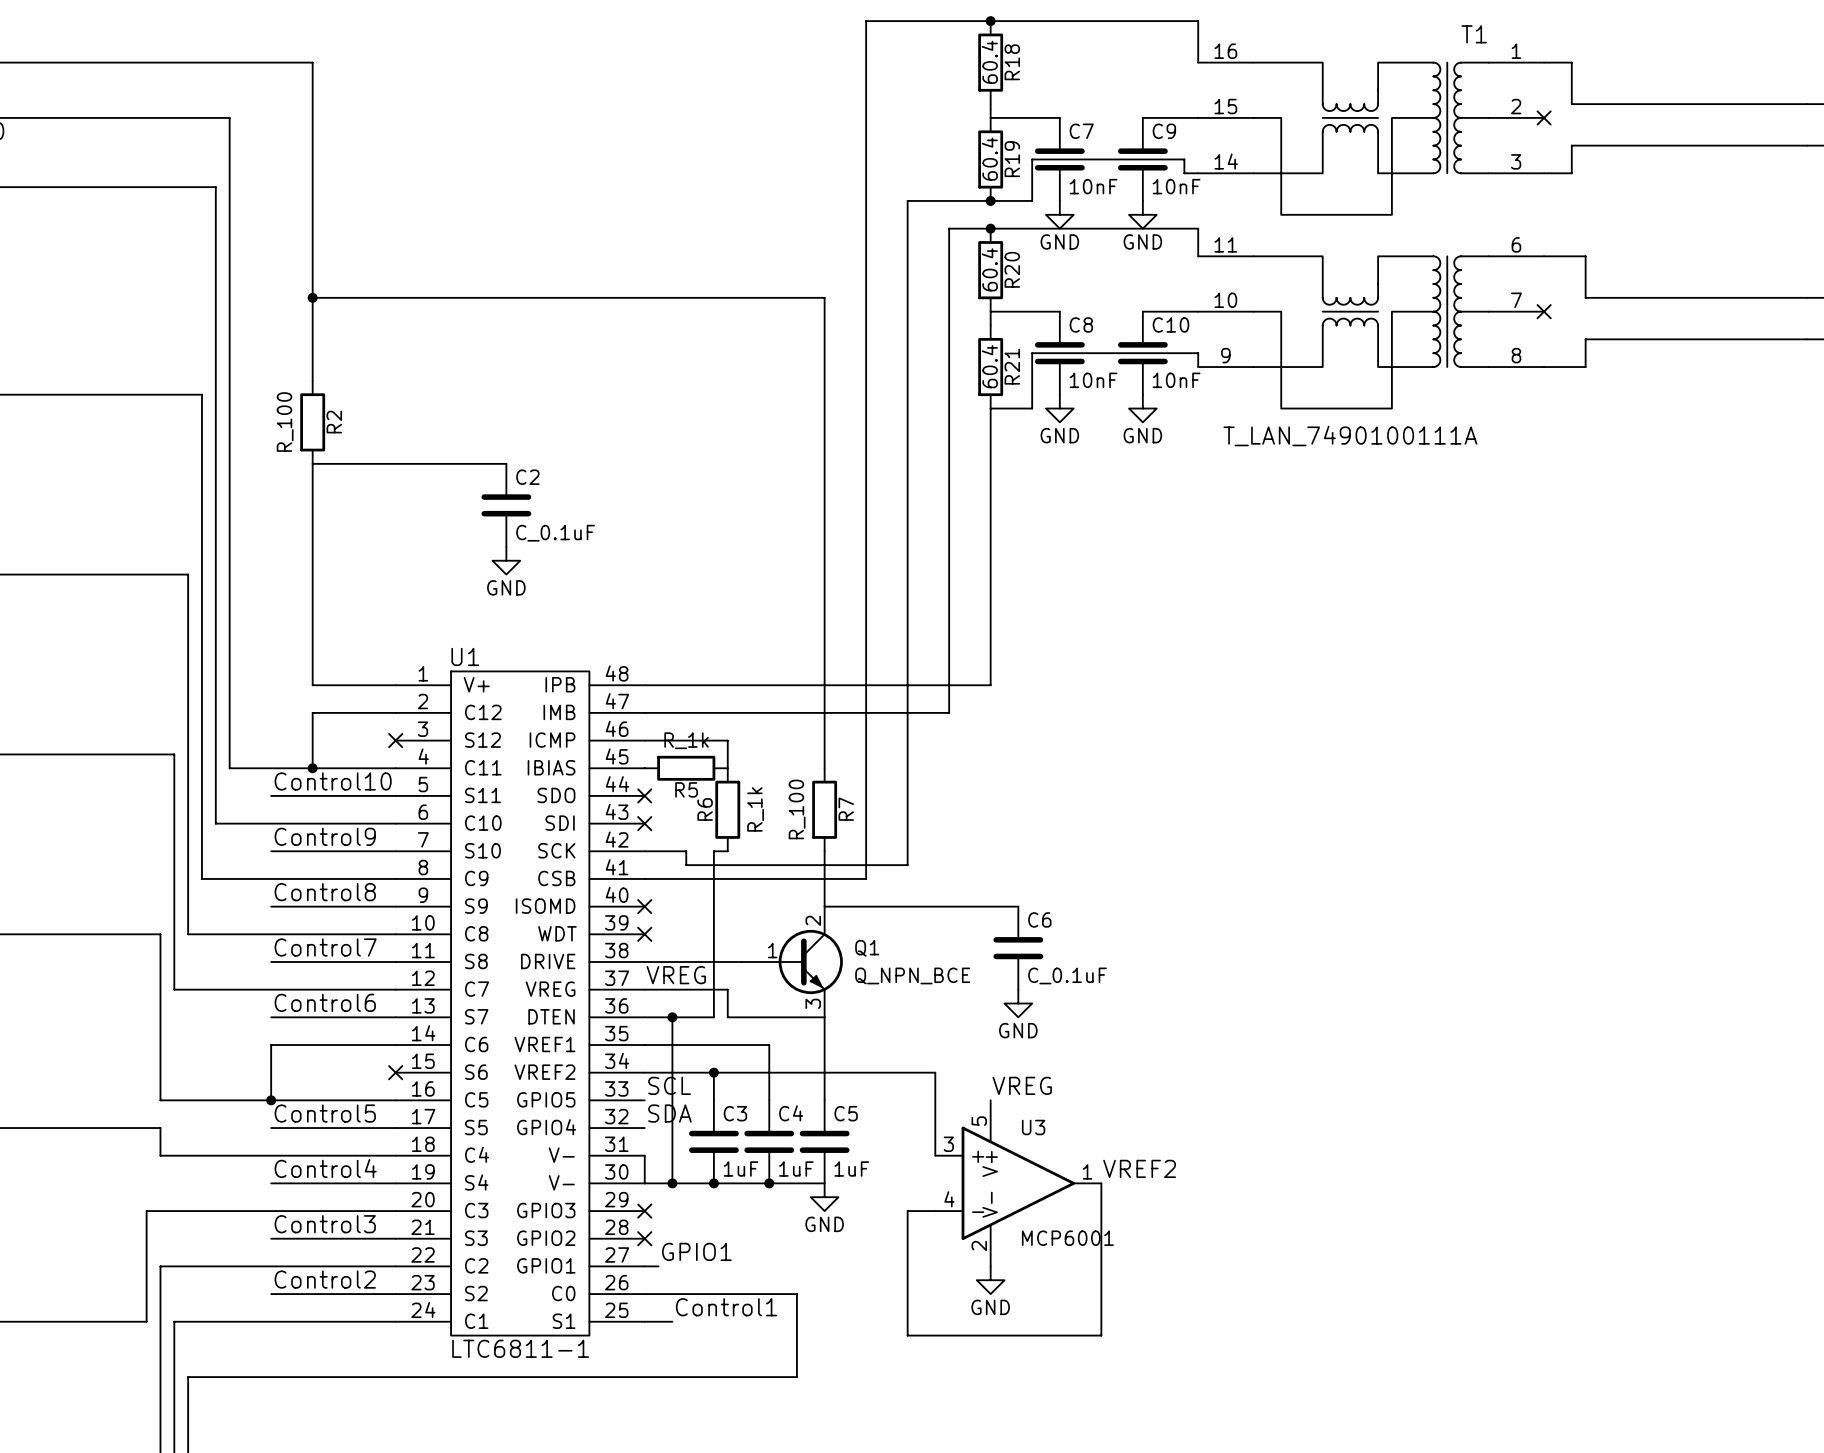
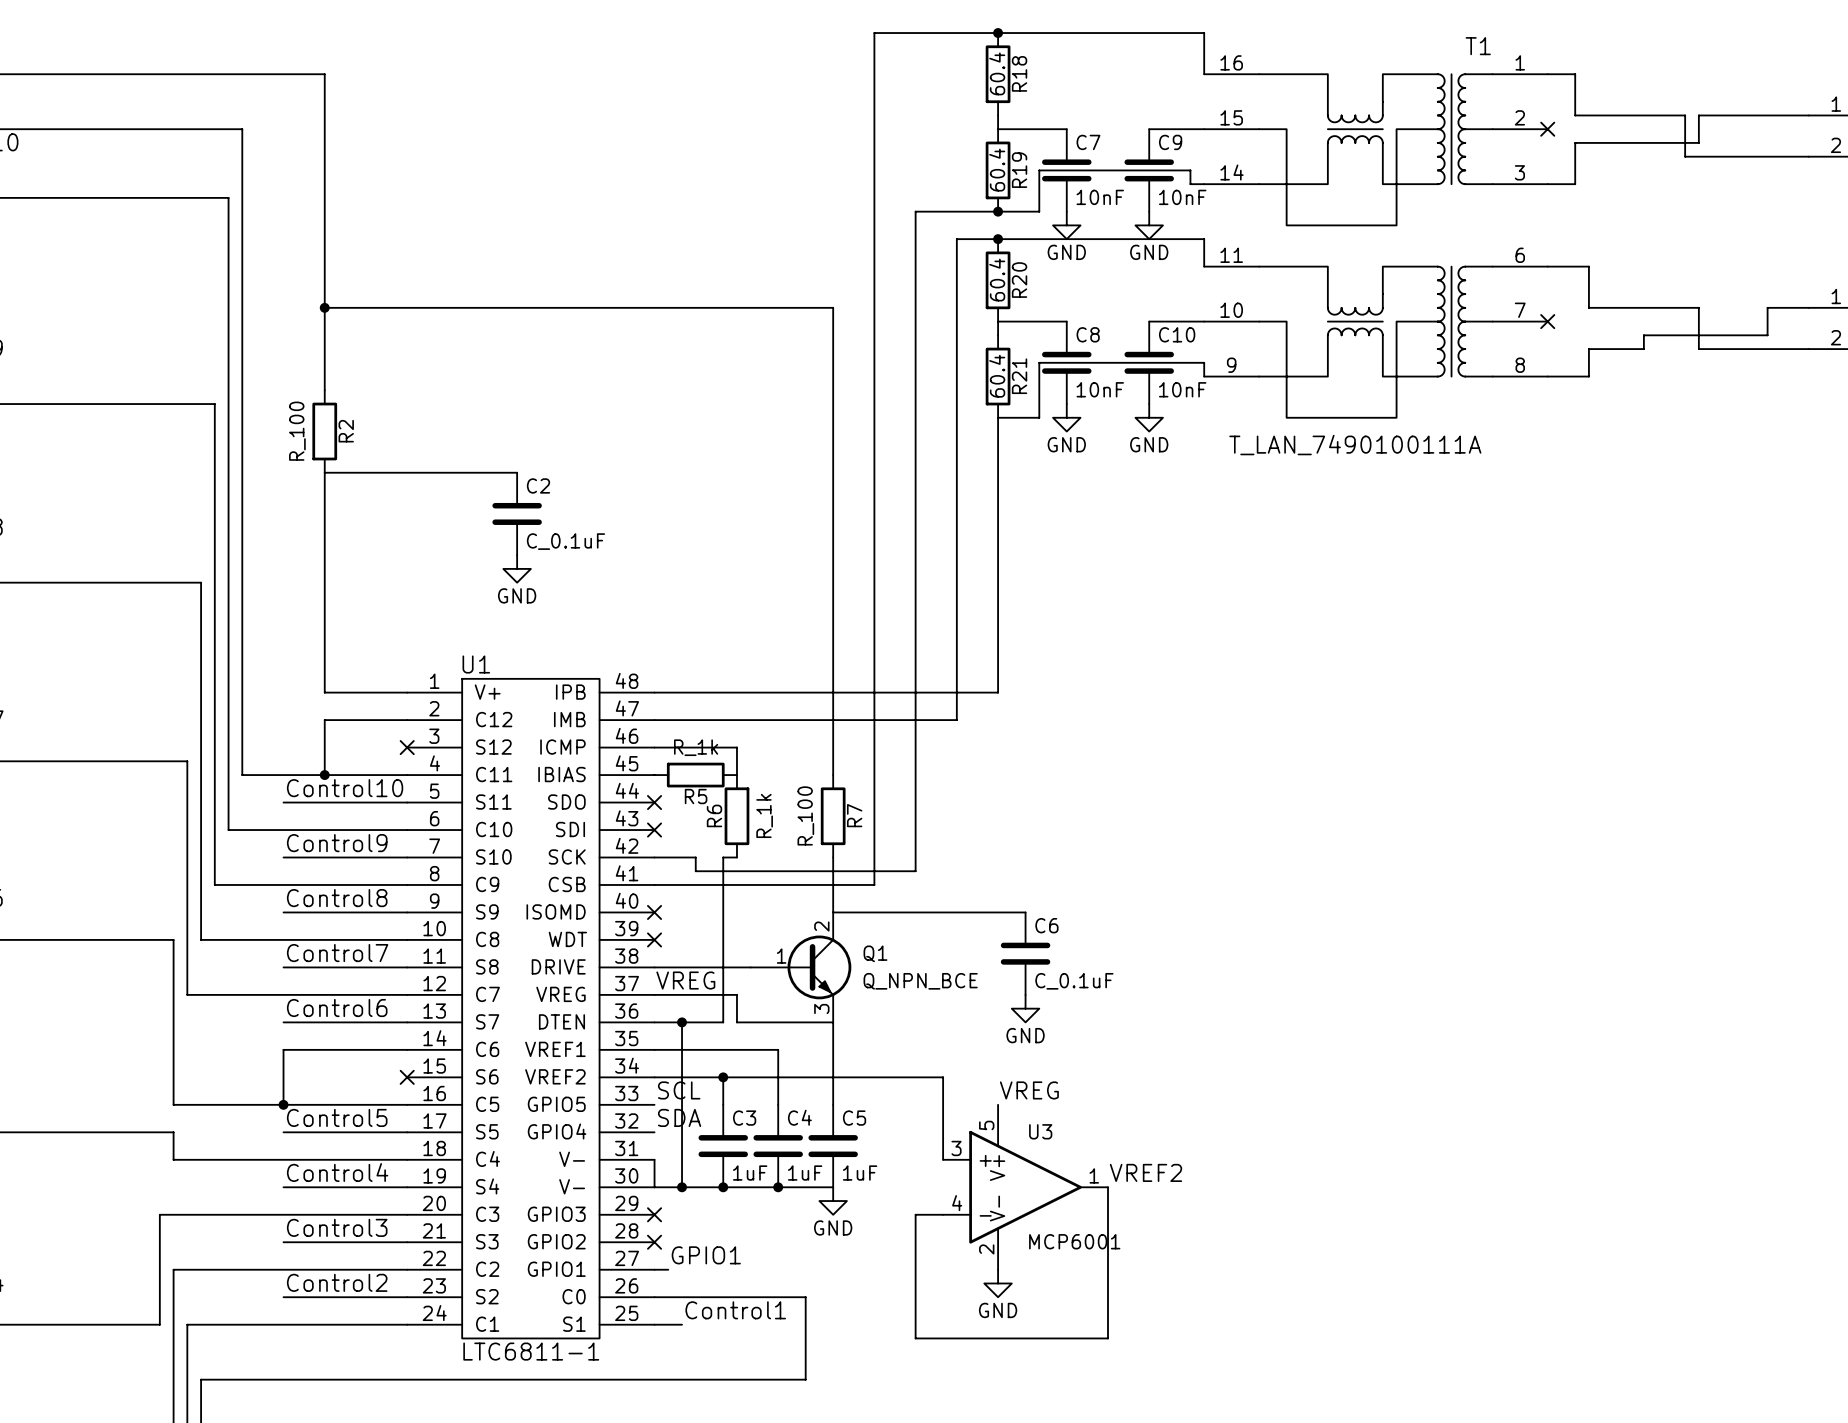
wire: (1682, 104) (1696, 104) -> (1685, 115) (1685, 156)
wire: (1571, 145) (1682, 145) -> (1575, 156) (1575, 142) (1698, 142) (1698, 115)
wire: (1696, 297) (1765, 297) -> (1643, 349) (1643, 335) (1767, 335) (1767, 307)
wire: (1640, 339) (1696, 339) -> (1698, 307) (1698, 349)

